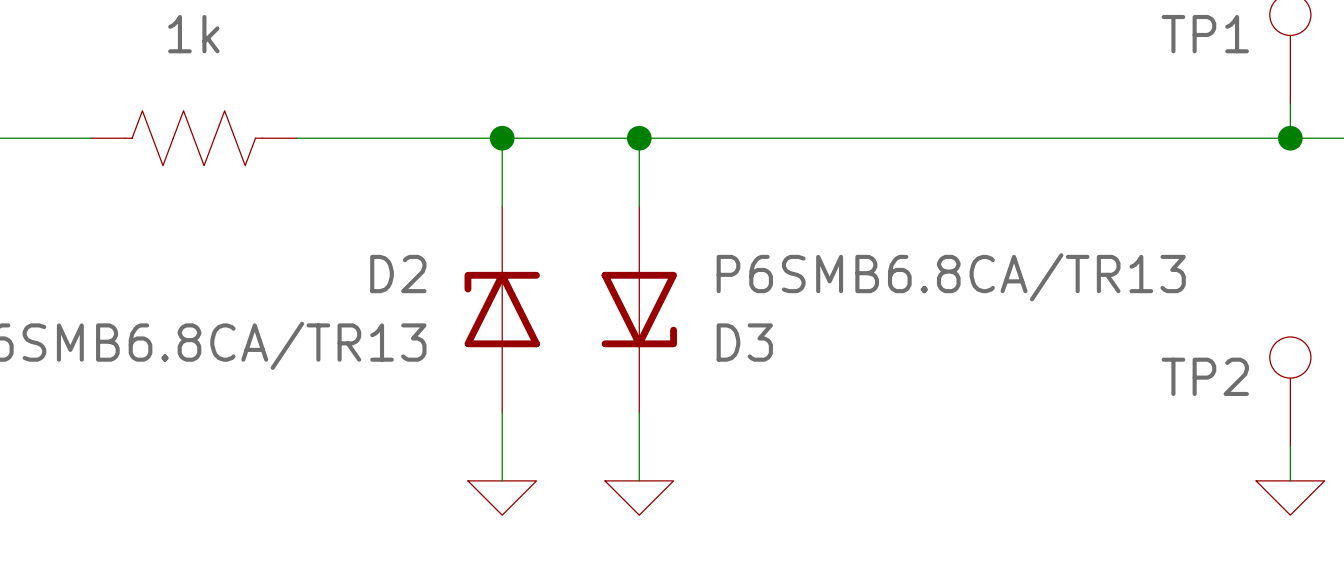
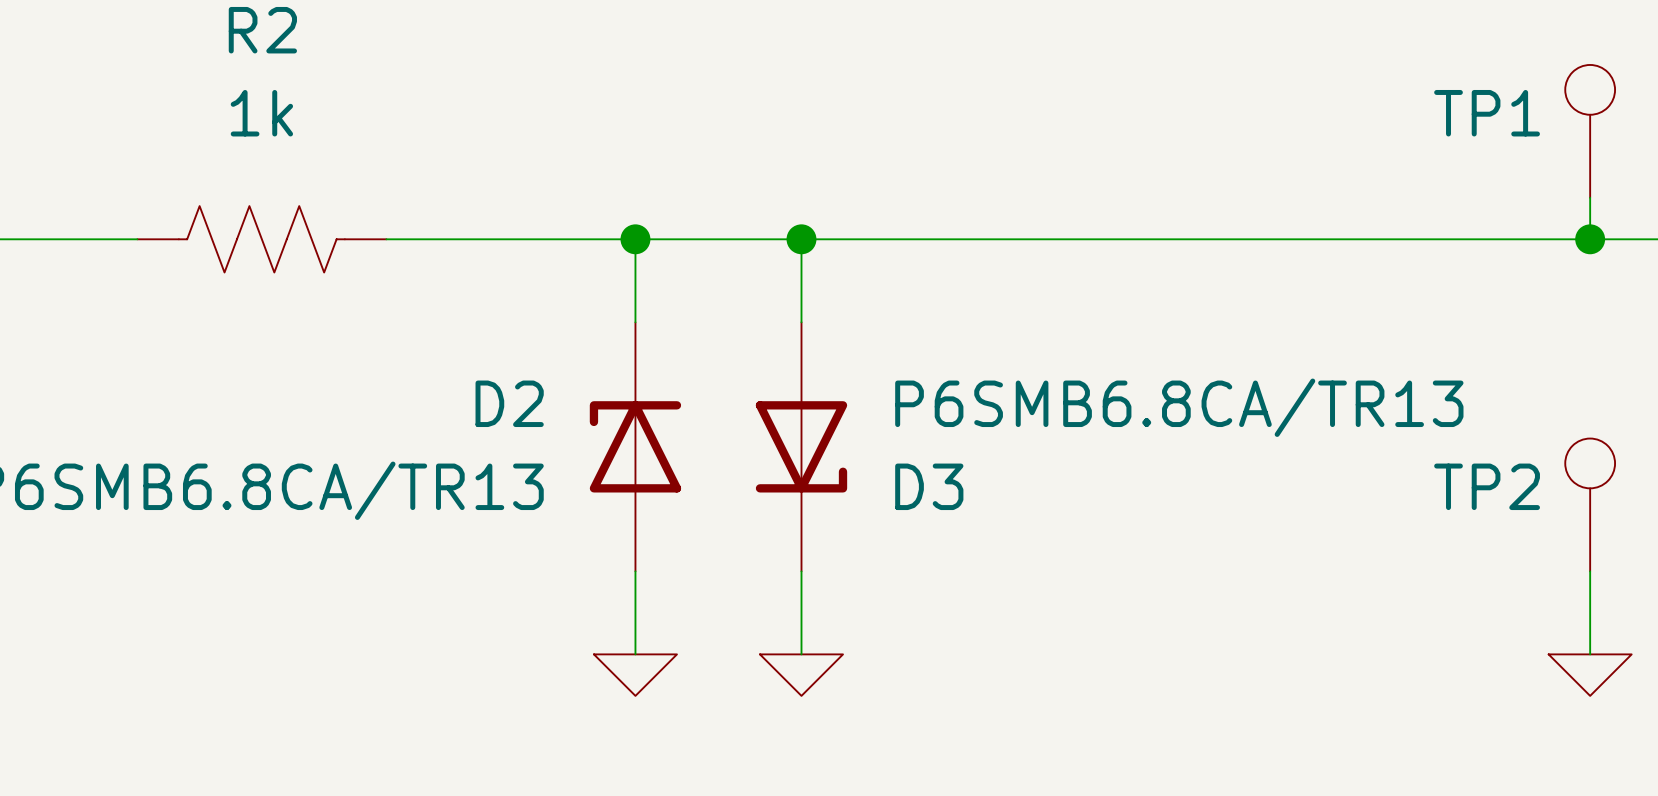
TP2 position: (1290, 391) -> (1590, 504)

